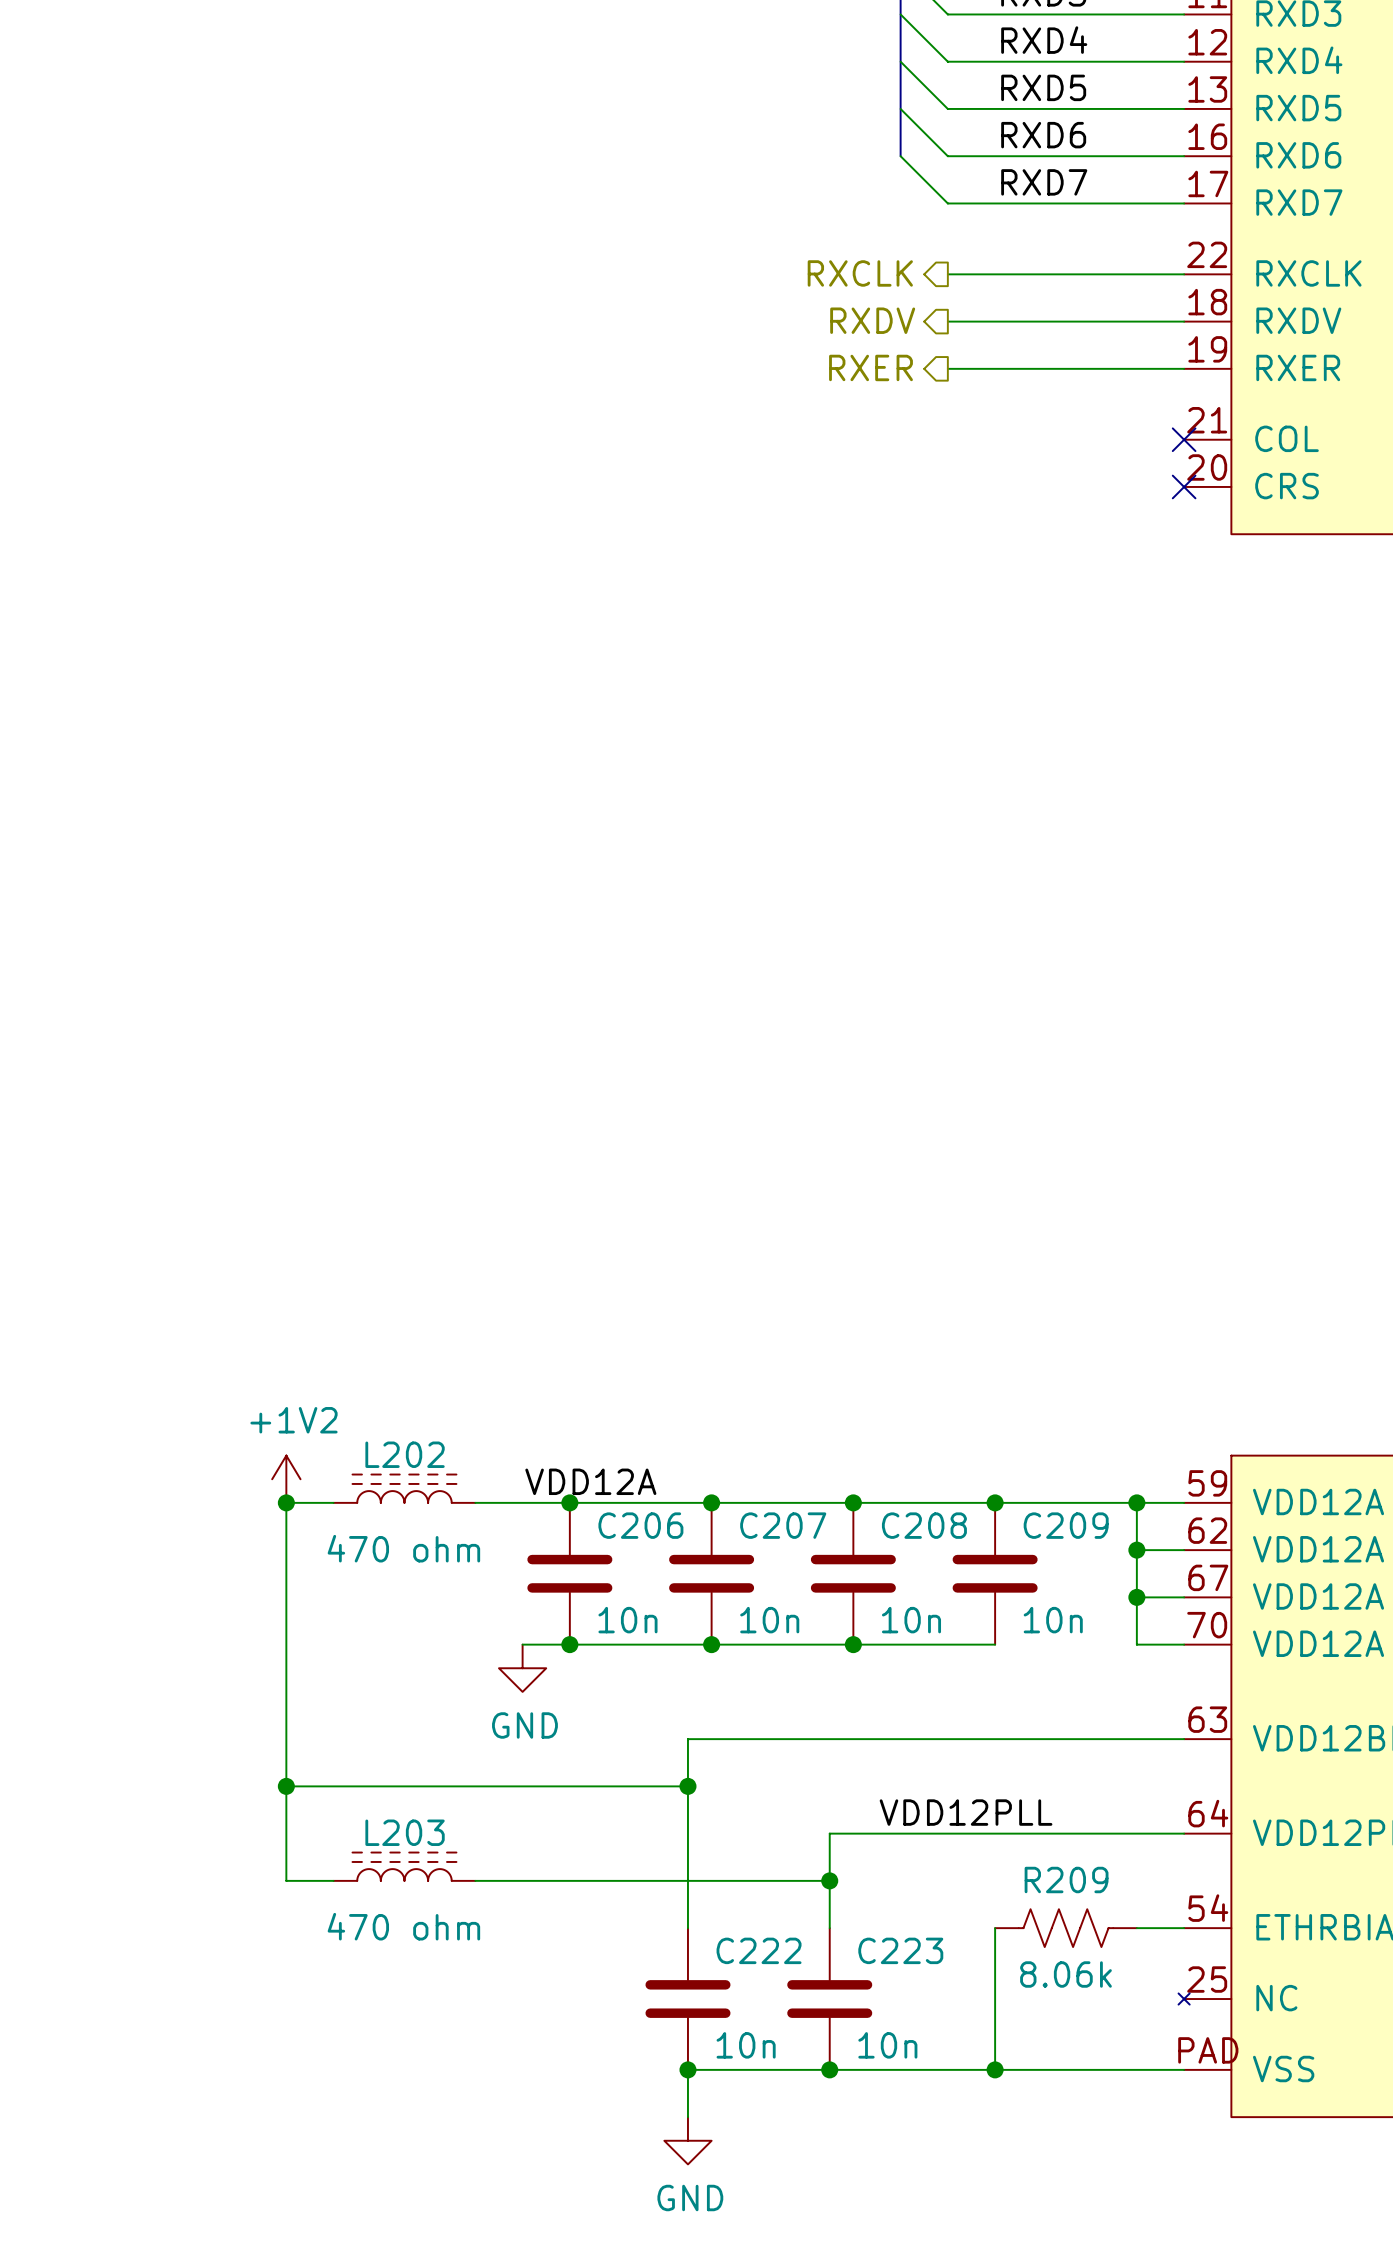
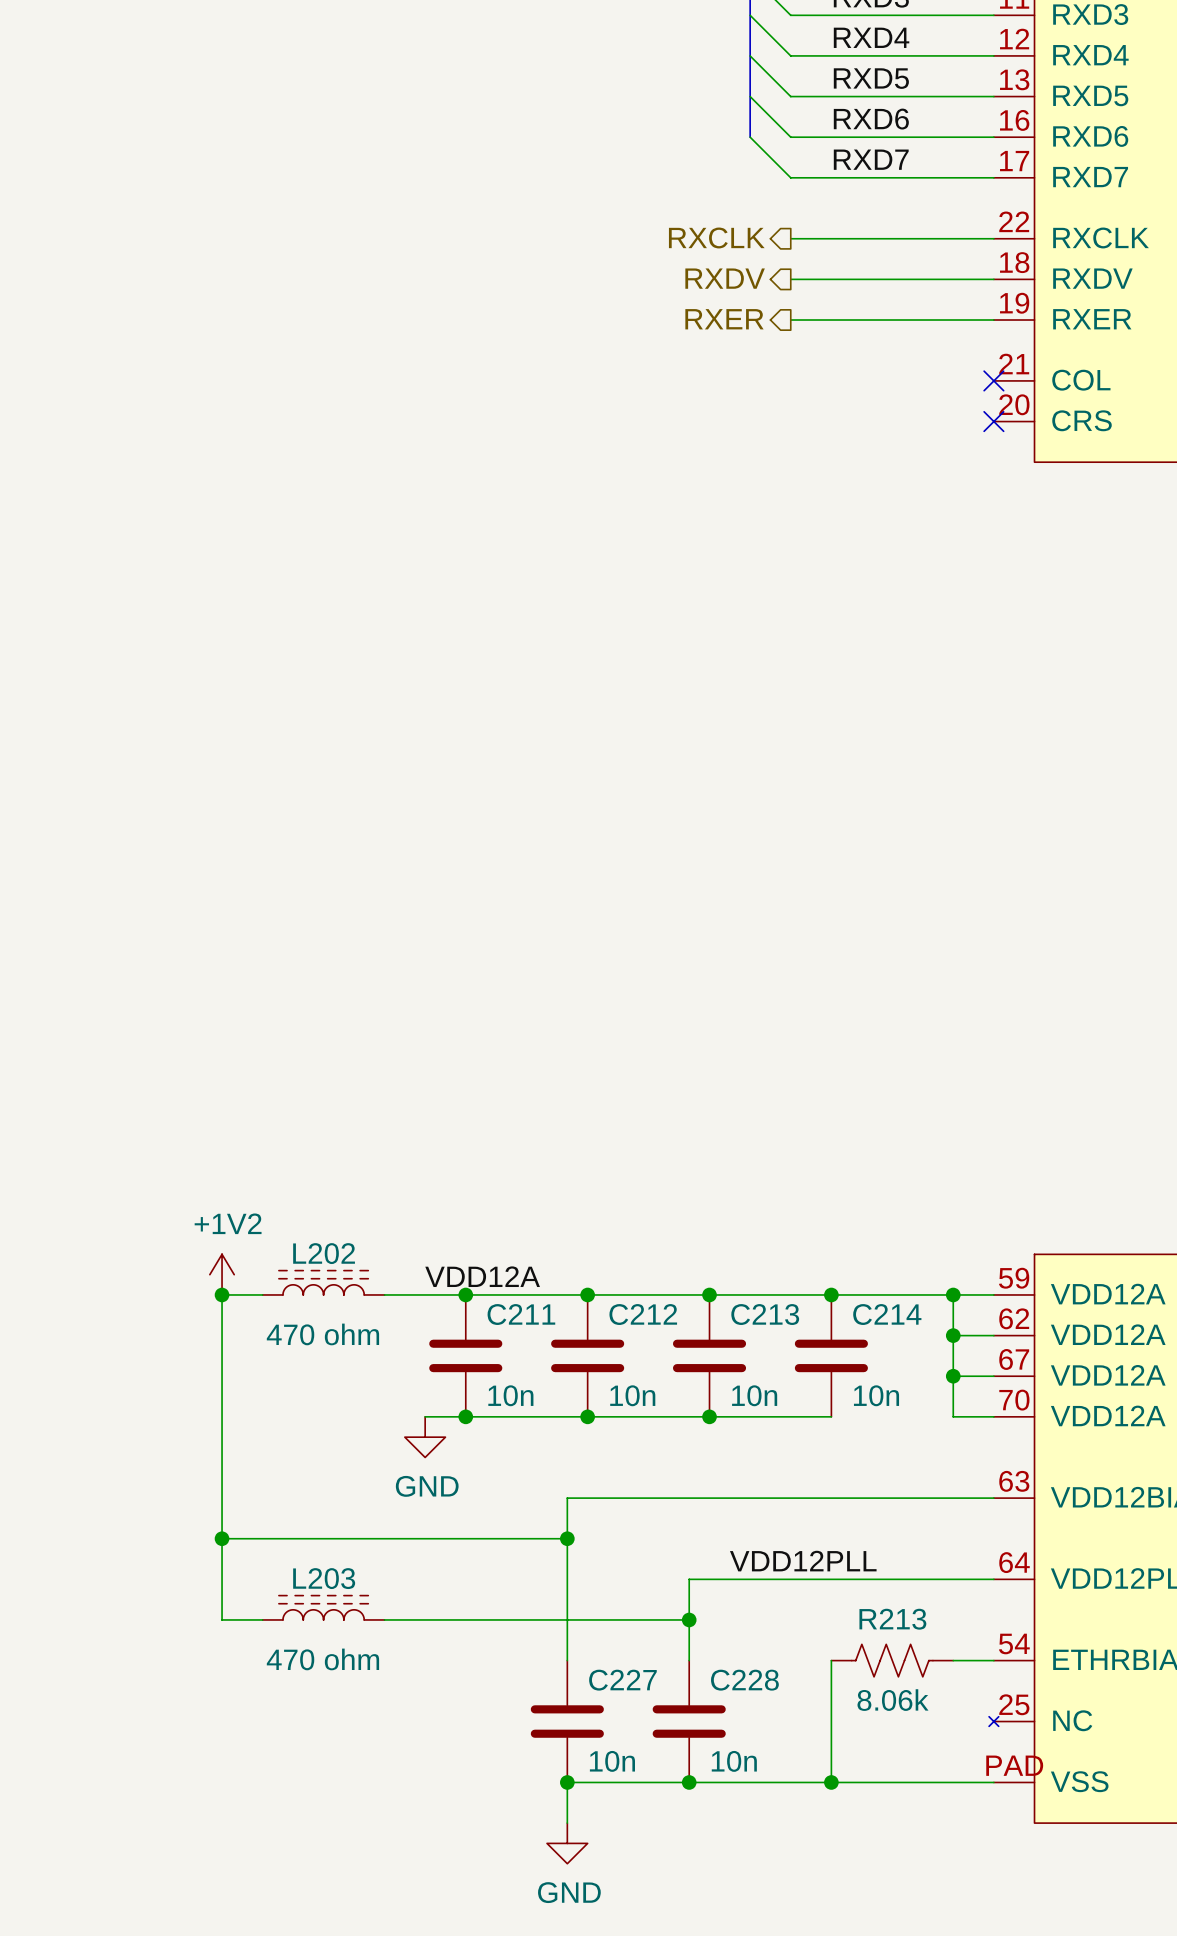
C206 name: C206 (640, 1525) -> C211 (521, 1314)
C207 name: C207 (783, 1525) -> C212 (643, 1314)
C208 name: C208 (924, 1525) -> C213 (765, 1314)
C209 name: C209 (1066, 1525) -> C214 (887, 1314)
R209 name: R209 (1066, 1880) -> R213 (892, 1619)
C222 name: C222 (759, 1950) -> C227 (622, 1680)
C223 name: C223 (900, 1950) -> C228 (744, 1680)

